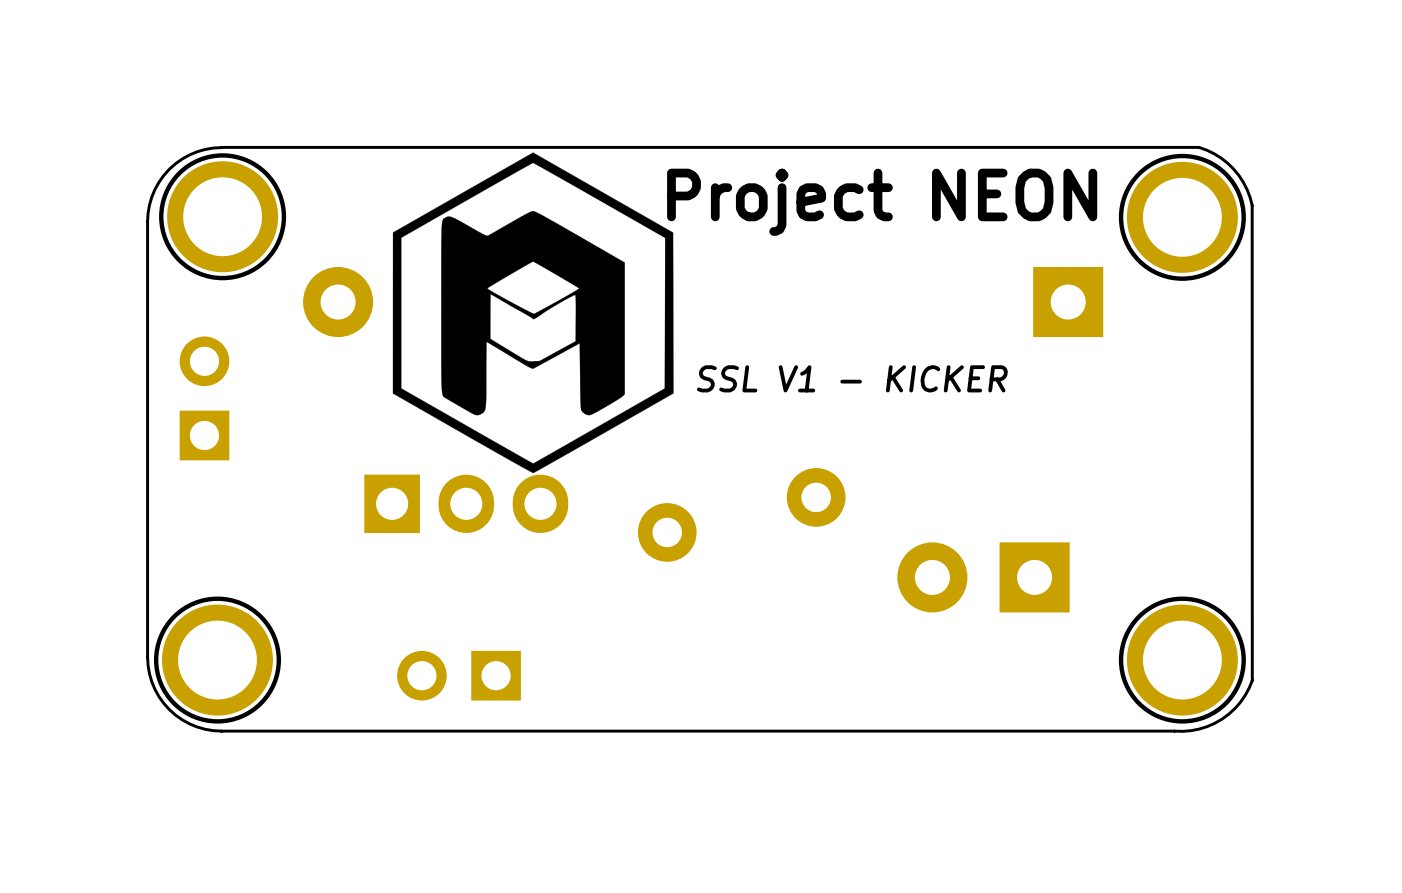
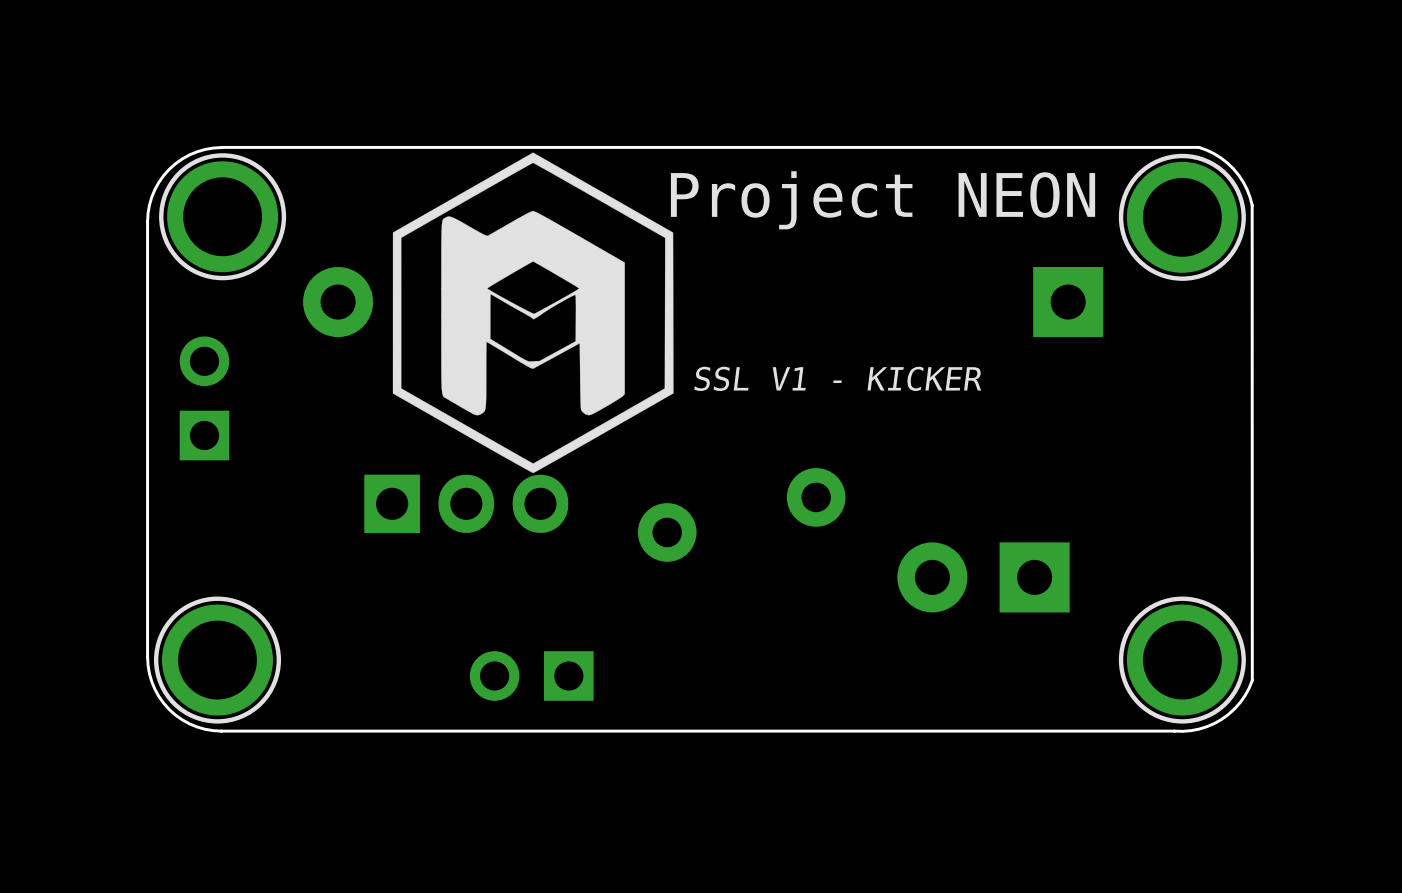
part position: (459, 675) -> (531, 675)

